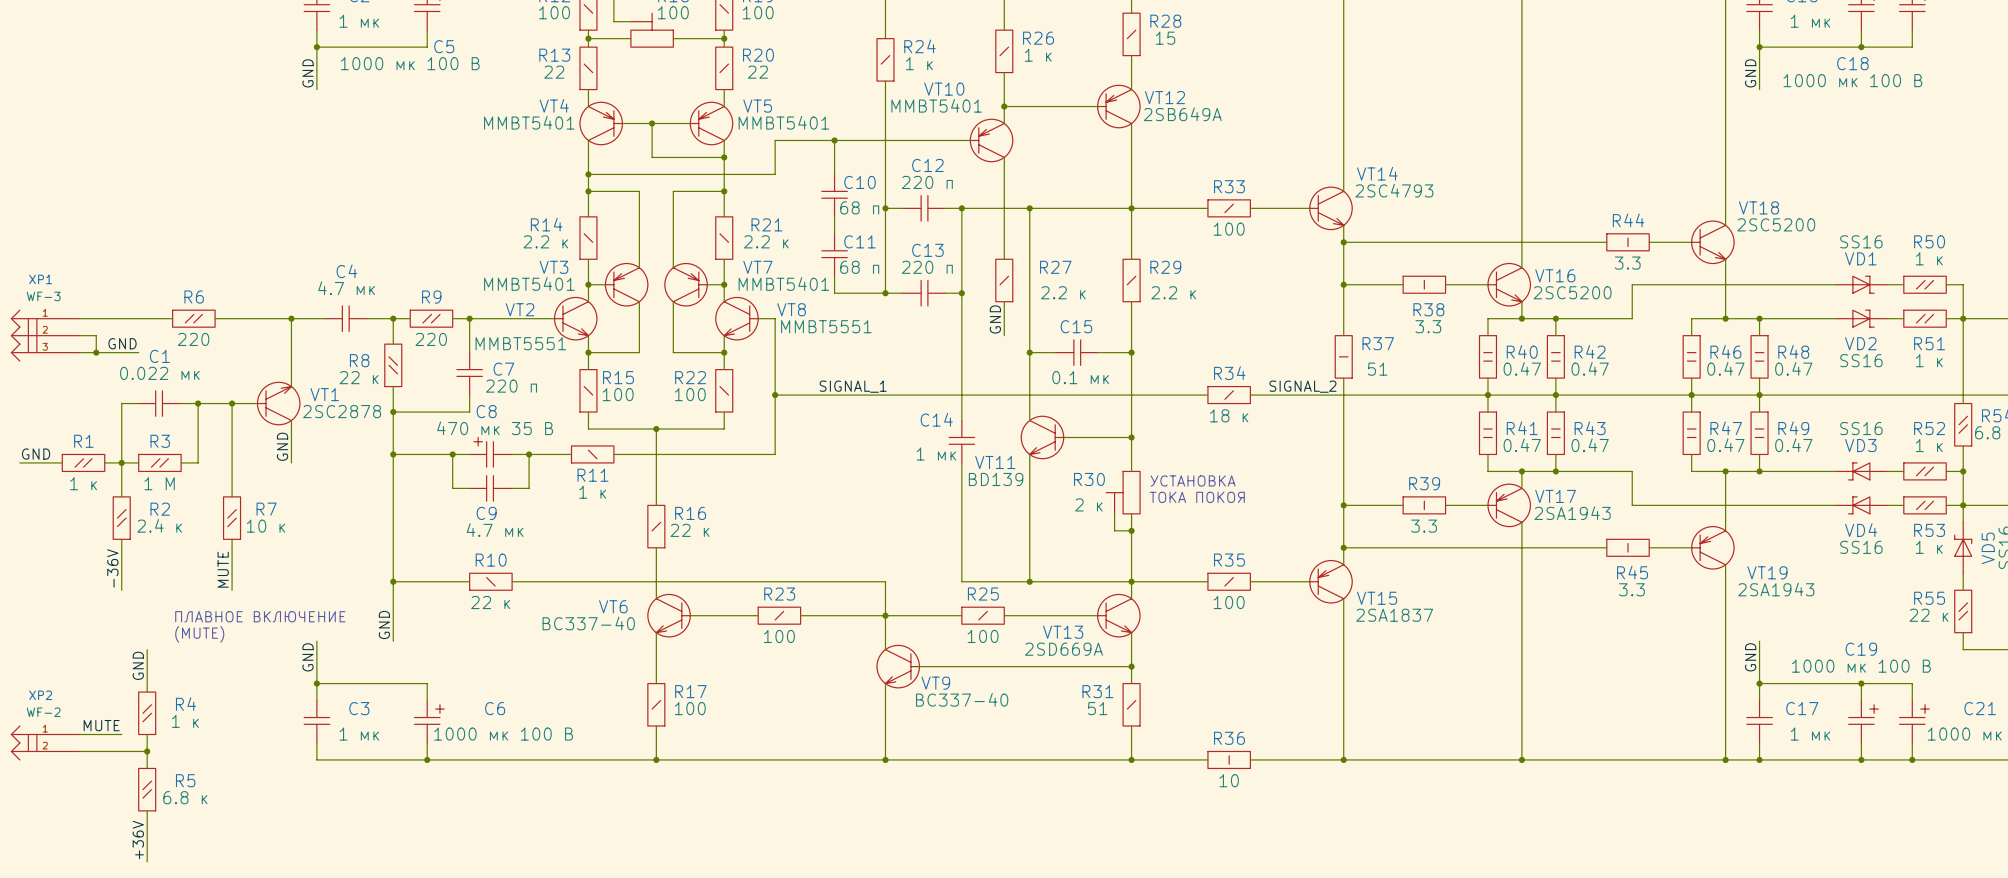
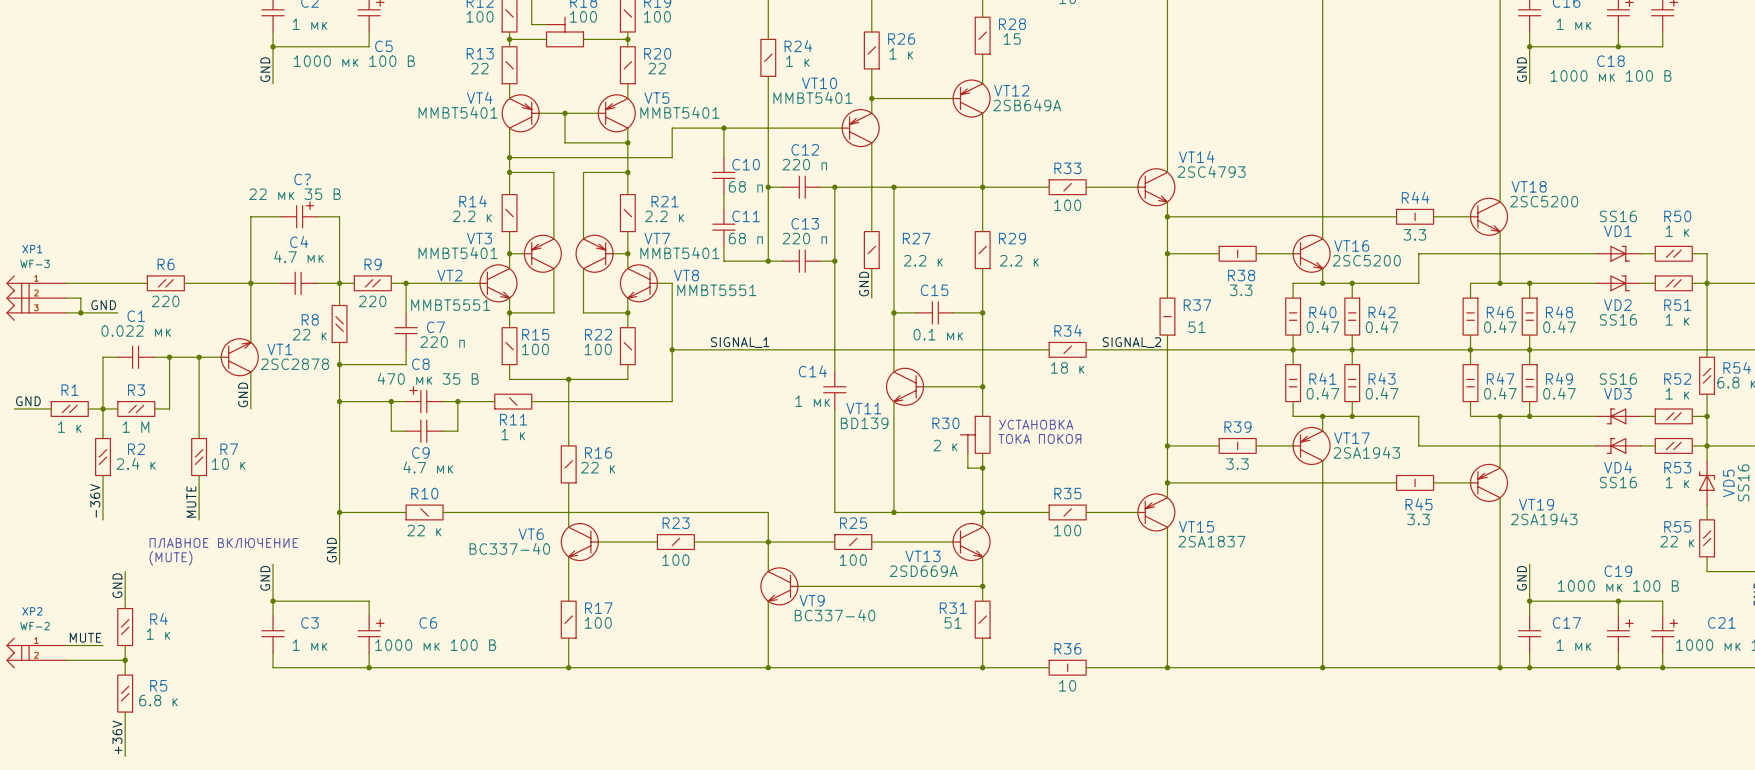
C?: none -> 22 мк 35 В (298, 214)
wire: none -> (280, 216) (250, 216) (250, 283)
wire: none -> (317, 216) (339, 216) (339, 283)

